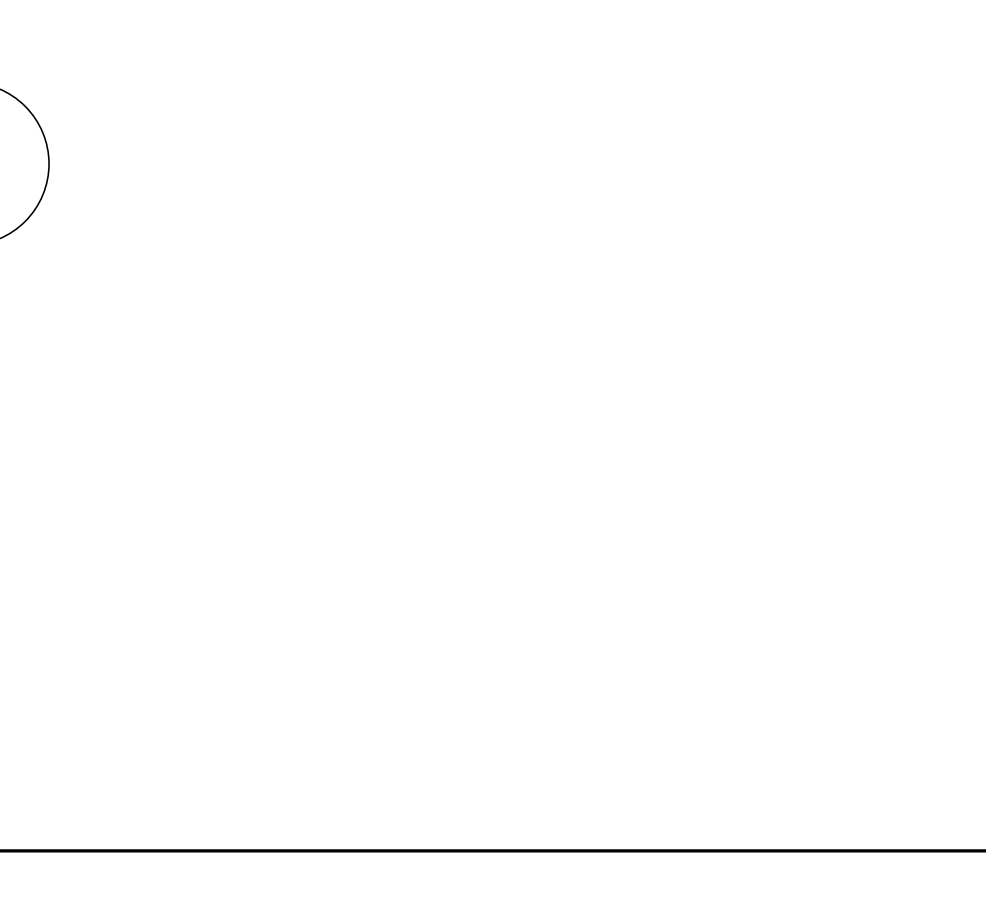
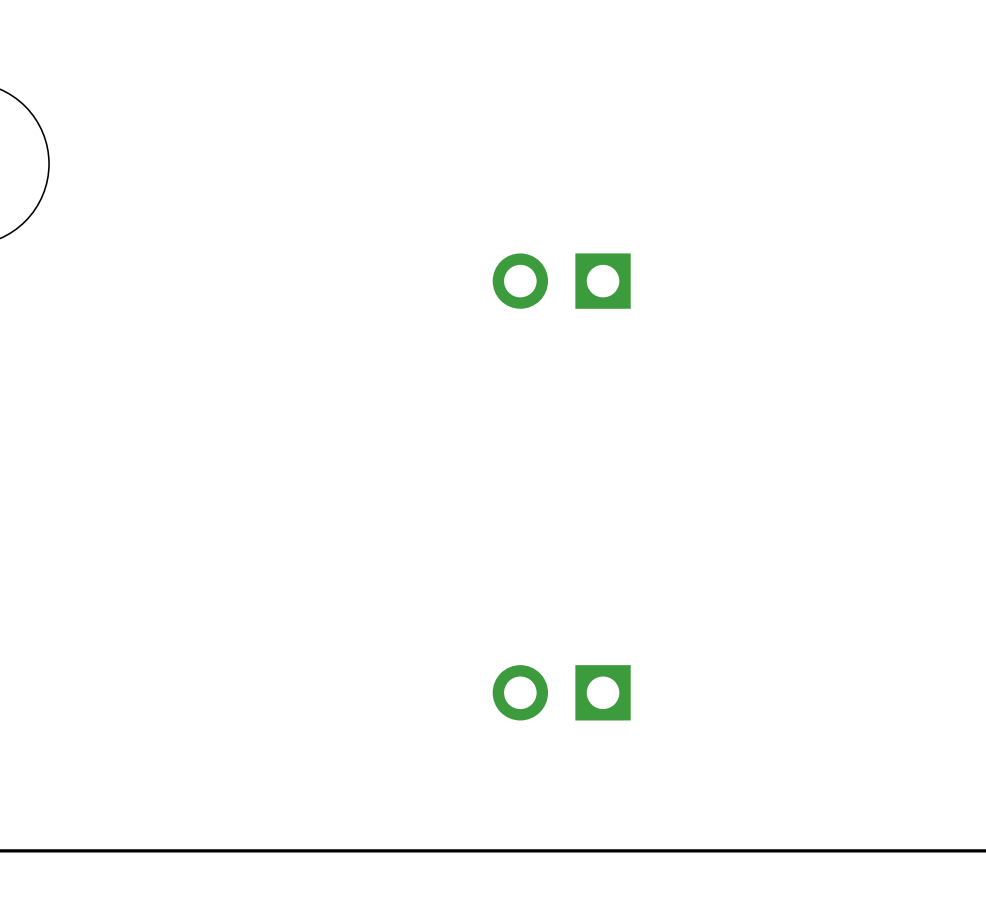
part: none -> (561, 281)
part: none -> (561, 692)

